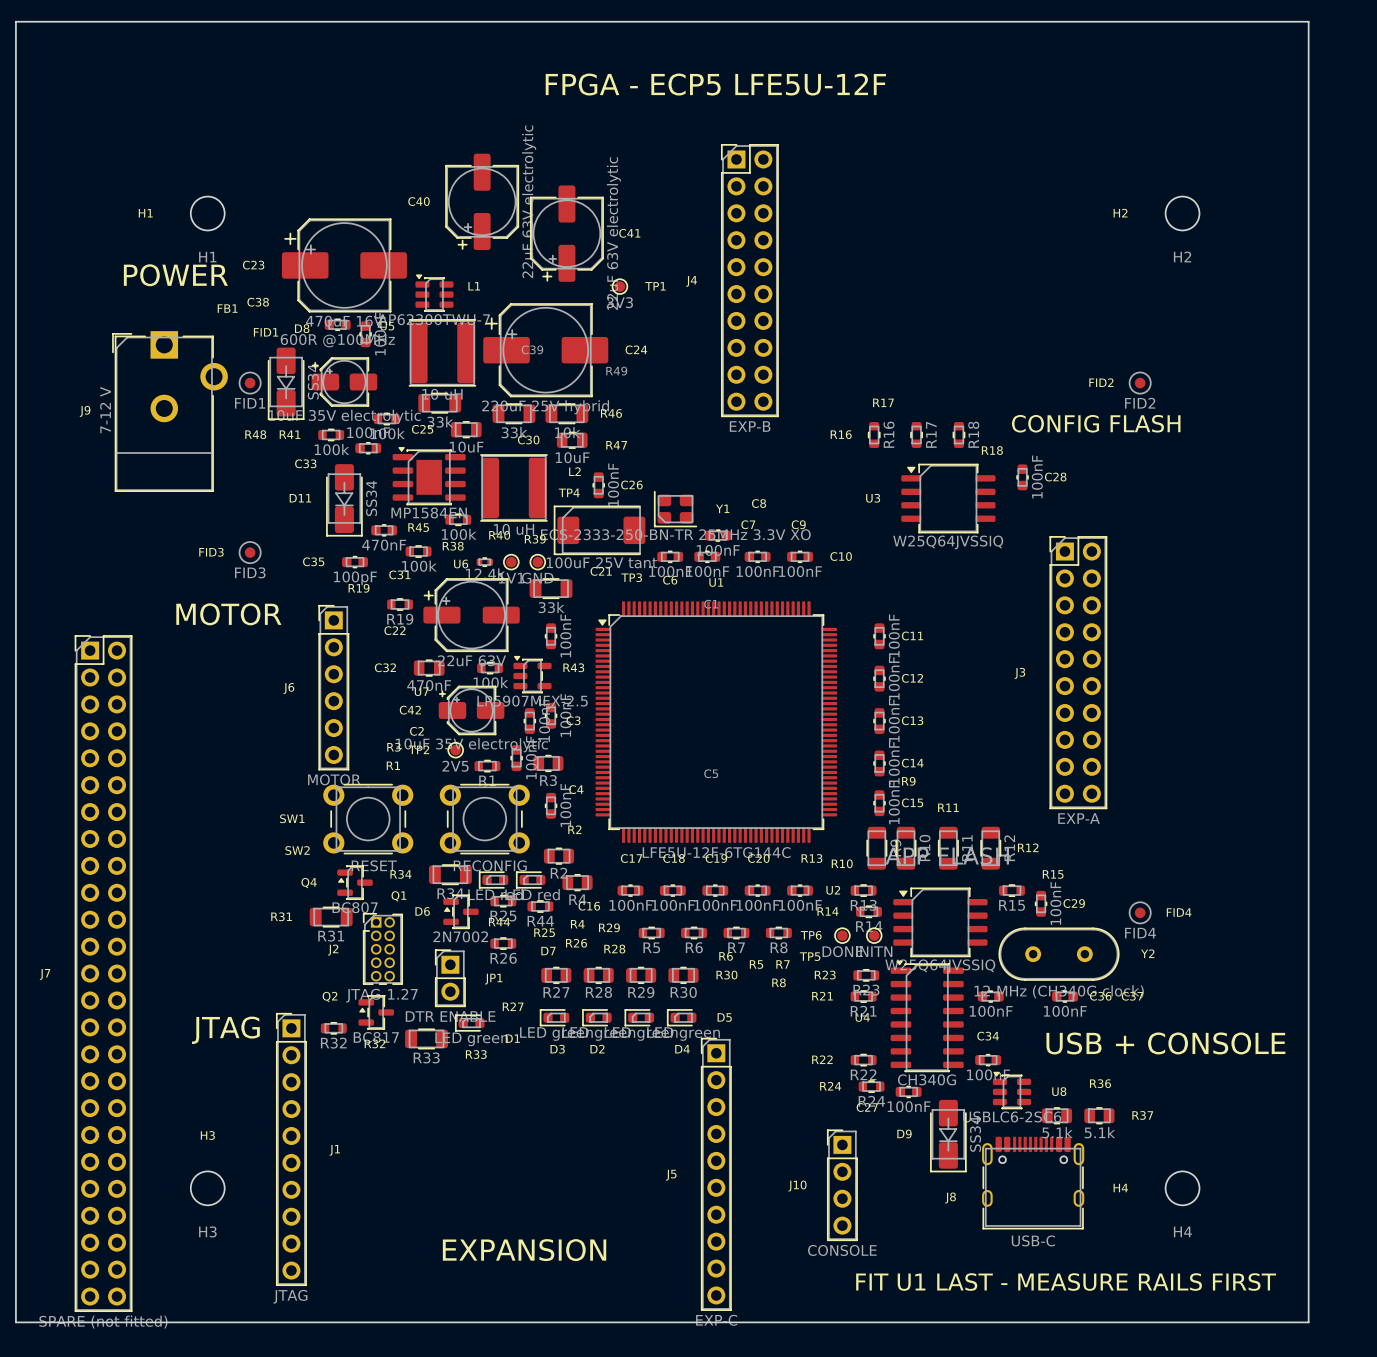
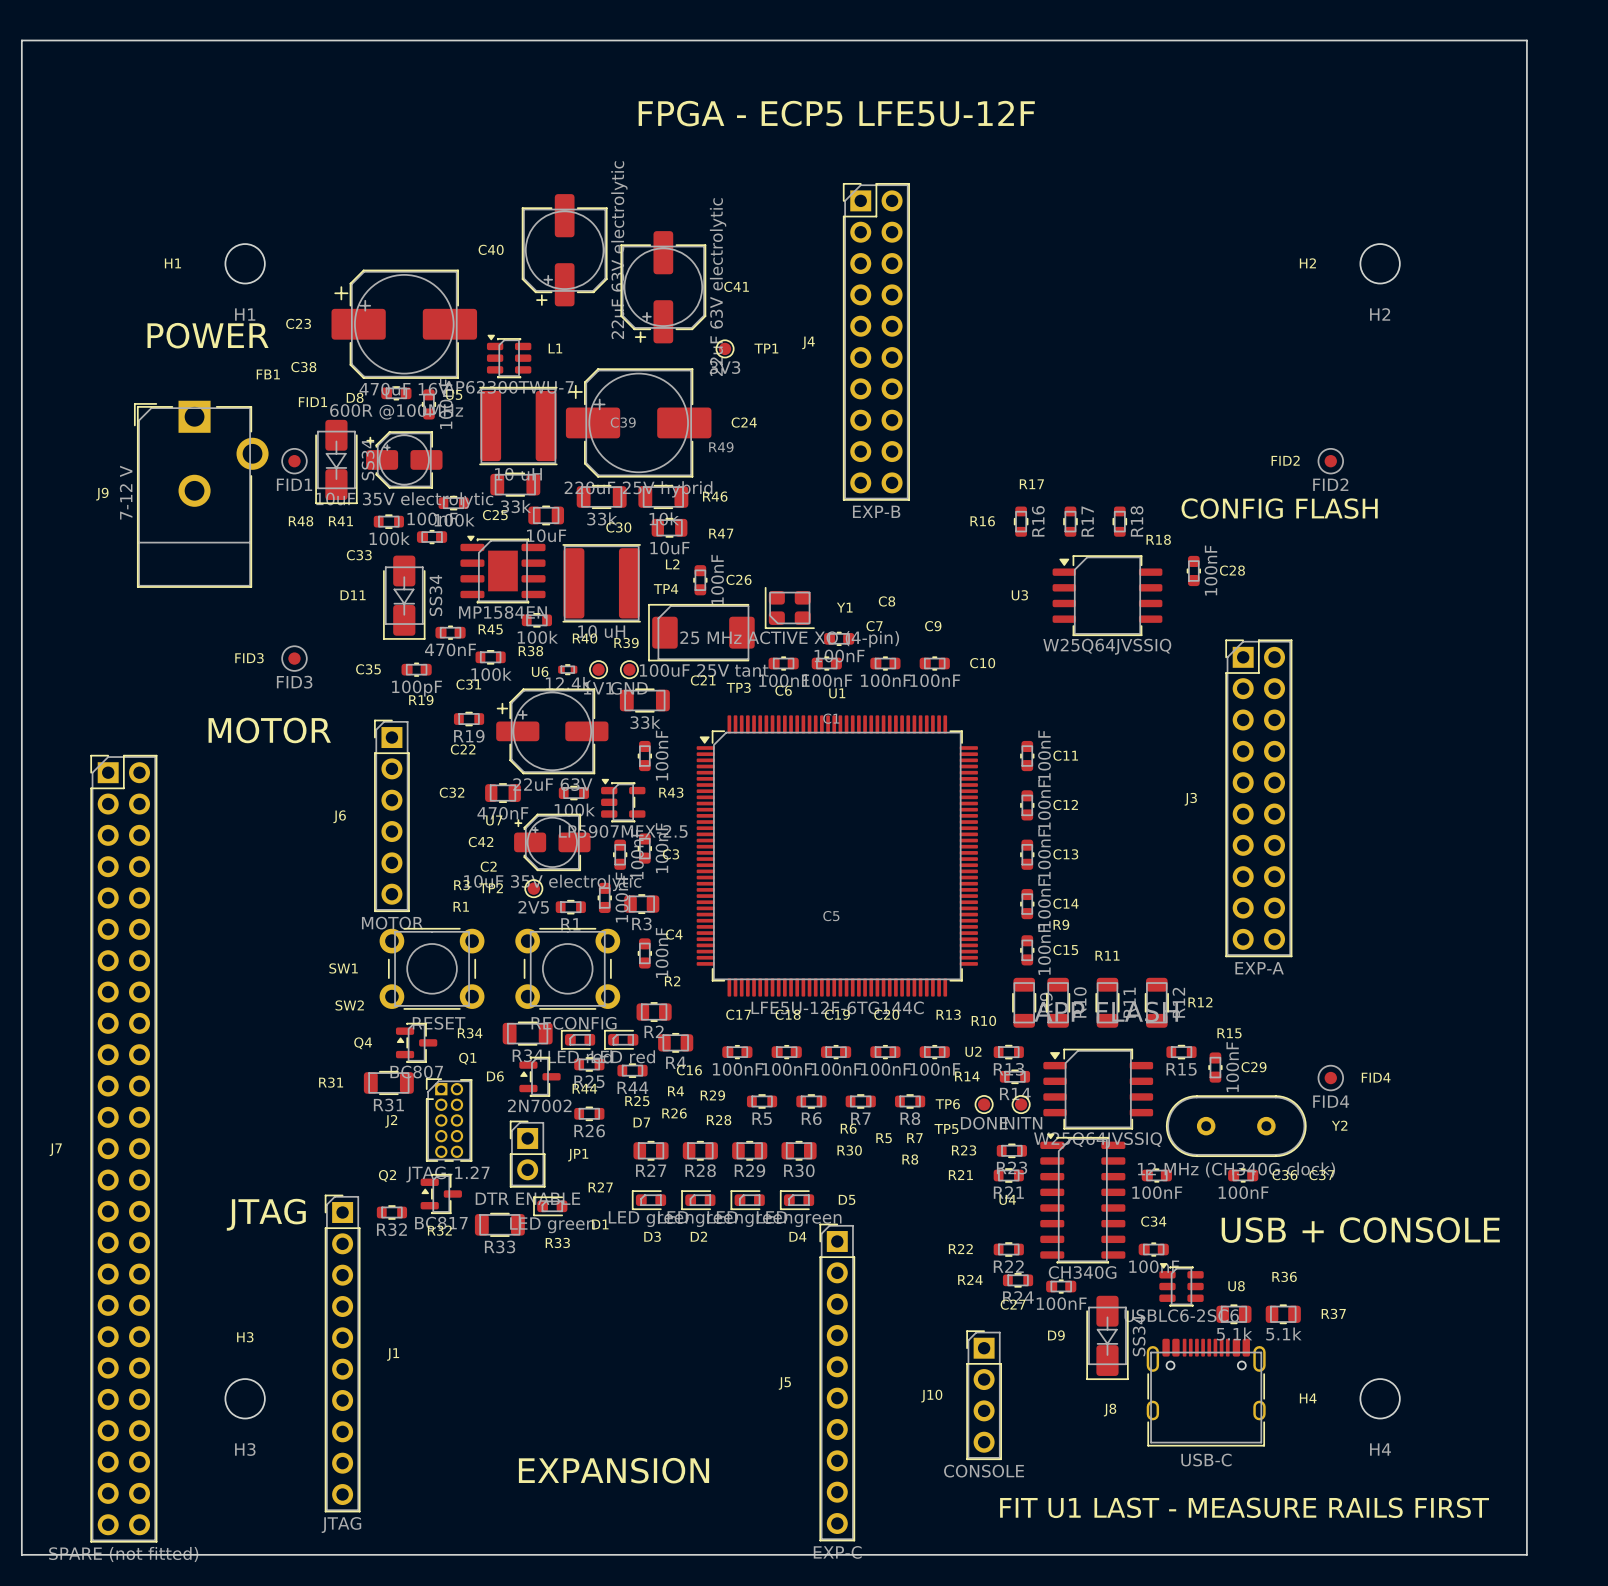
Y1 value: ECS-2333-250-BN-TR 25MHz 3.3V XO (675, 534) -> 25 MHz ACTIVE XO (4-pin) (789, 639)

